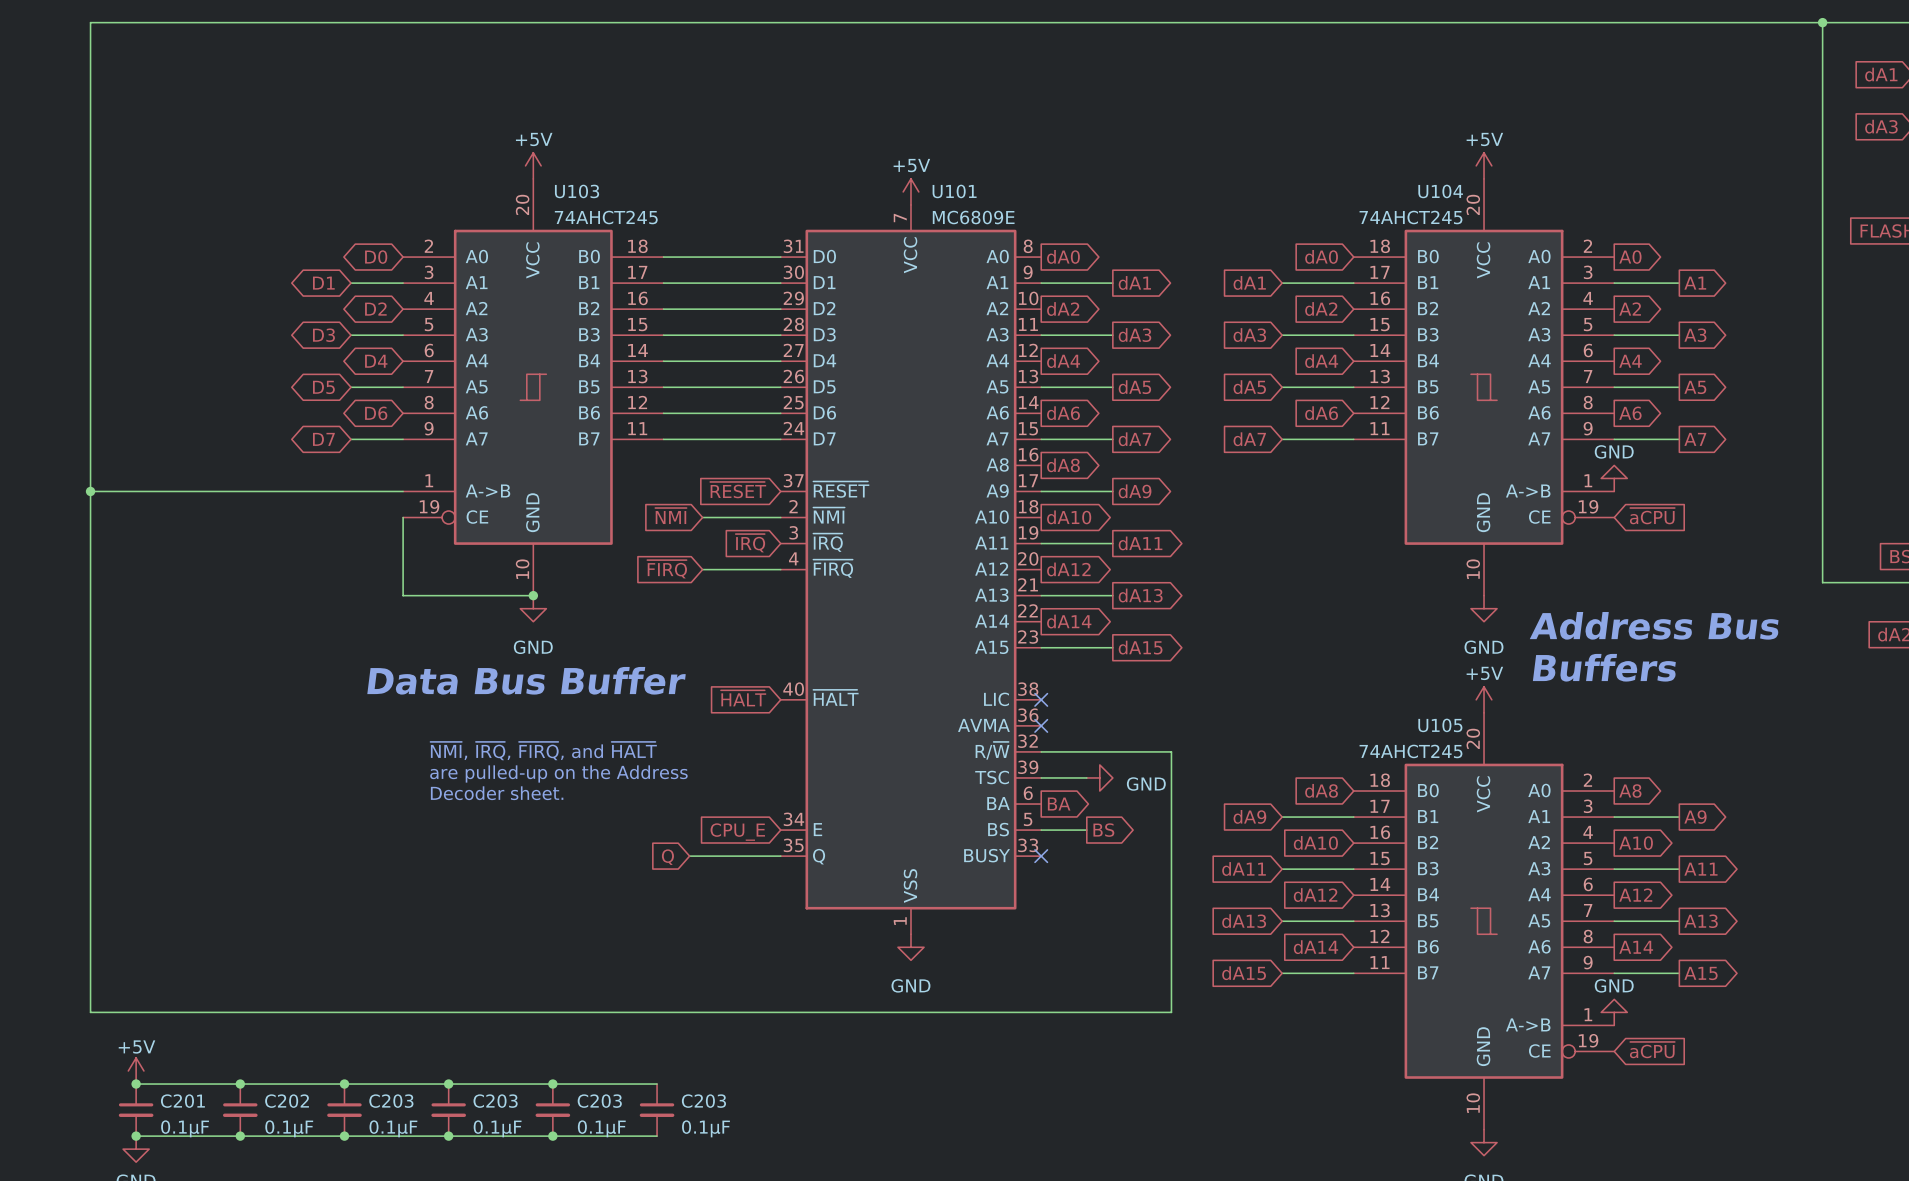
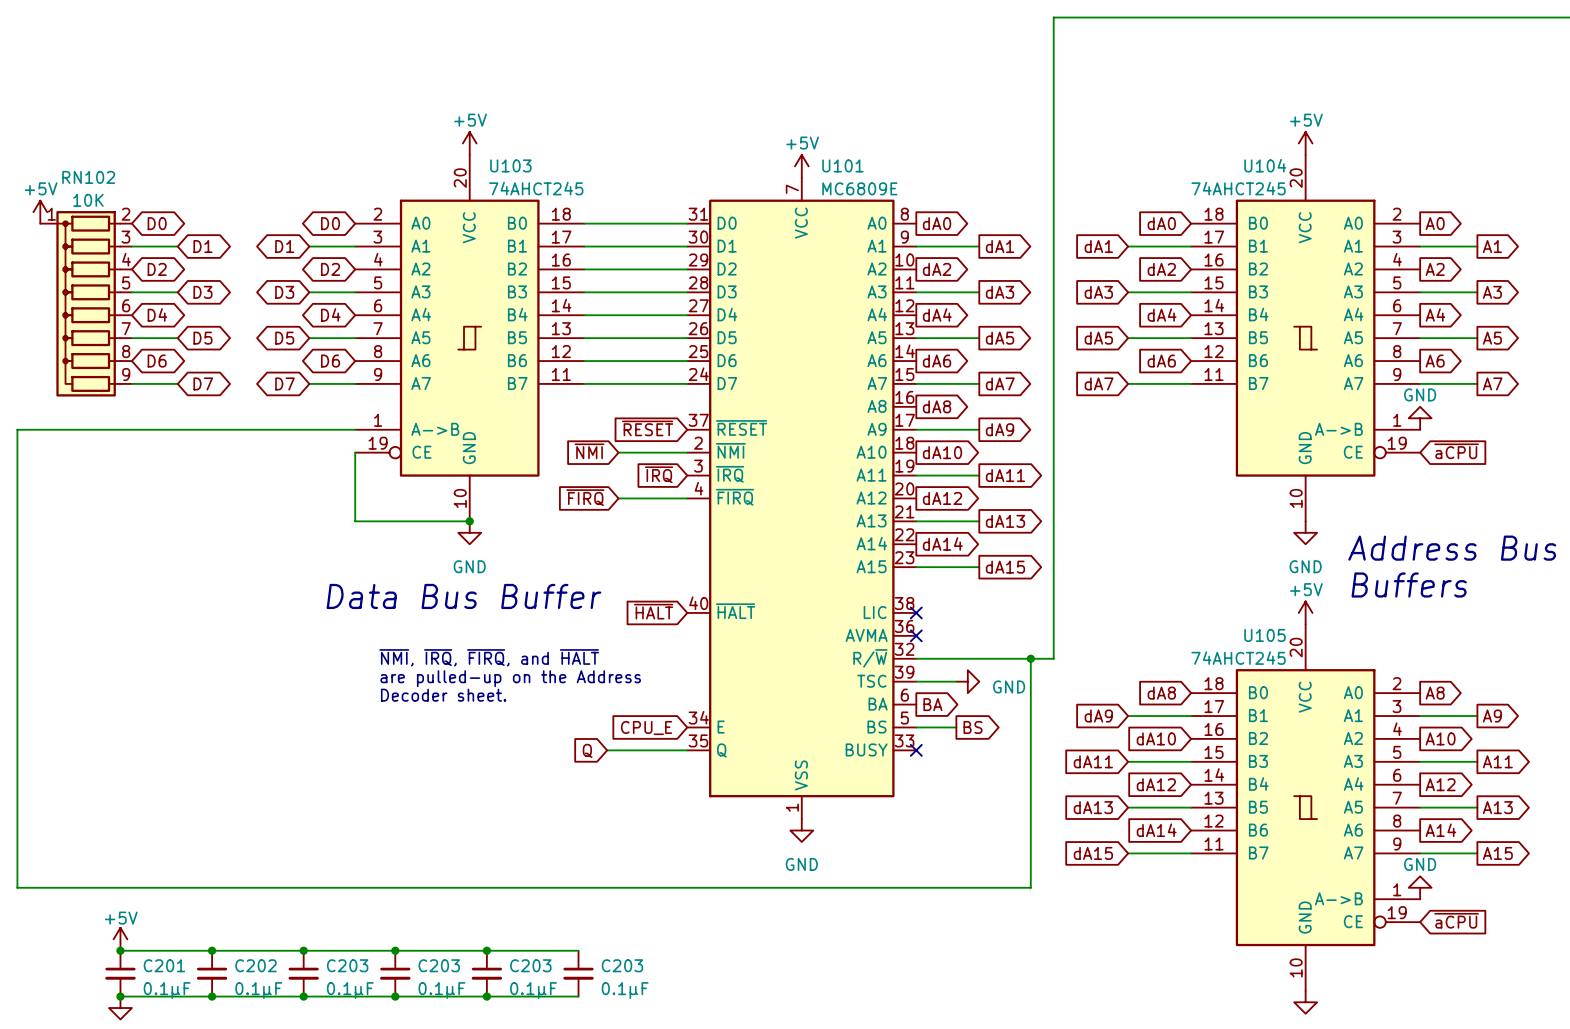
wire: (1197, 22) (90, 22) (90, 1012) -> (1053, 17) (1053, 658) (1030, 658)
power symbol: none -> +5V (40, 212)
global label: none -> D0 (157, 223)
wire: none -> (131, 246) (177, 246)
global label: none -> D1 (202, 246)
global label: none -> D2 (157, 269)
wire: none -> (131, 292) (177, 292)
global label: none -> D3 (202, 292)
RN102: none -> 10K (86, 303)
global label: none -> D4 (157, 314)
wire: none -> (131, 338) (177, 338)
global label: none -> D5 (202, 338)
global label: none -> D6 (157, 361)
wire: none -> (131, 383) (177, 383)
global label: none -> D7 (203, 383)
wire: none -> (80, 429) (17, 429) (17, 887) (80, 887)
junction: (90, 491) -> none
junction: none -> (1030, 658)

